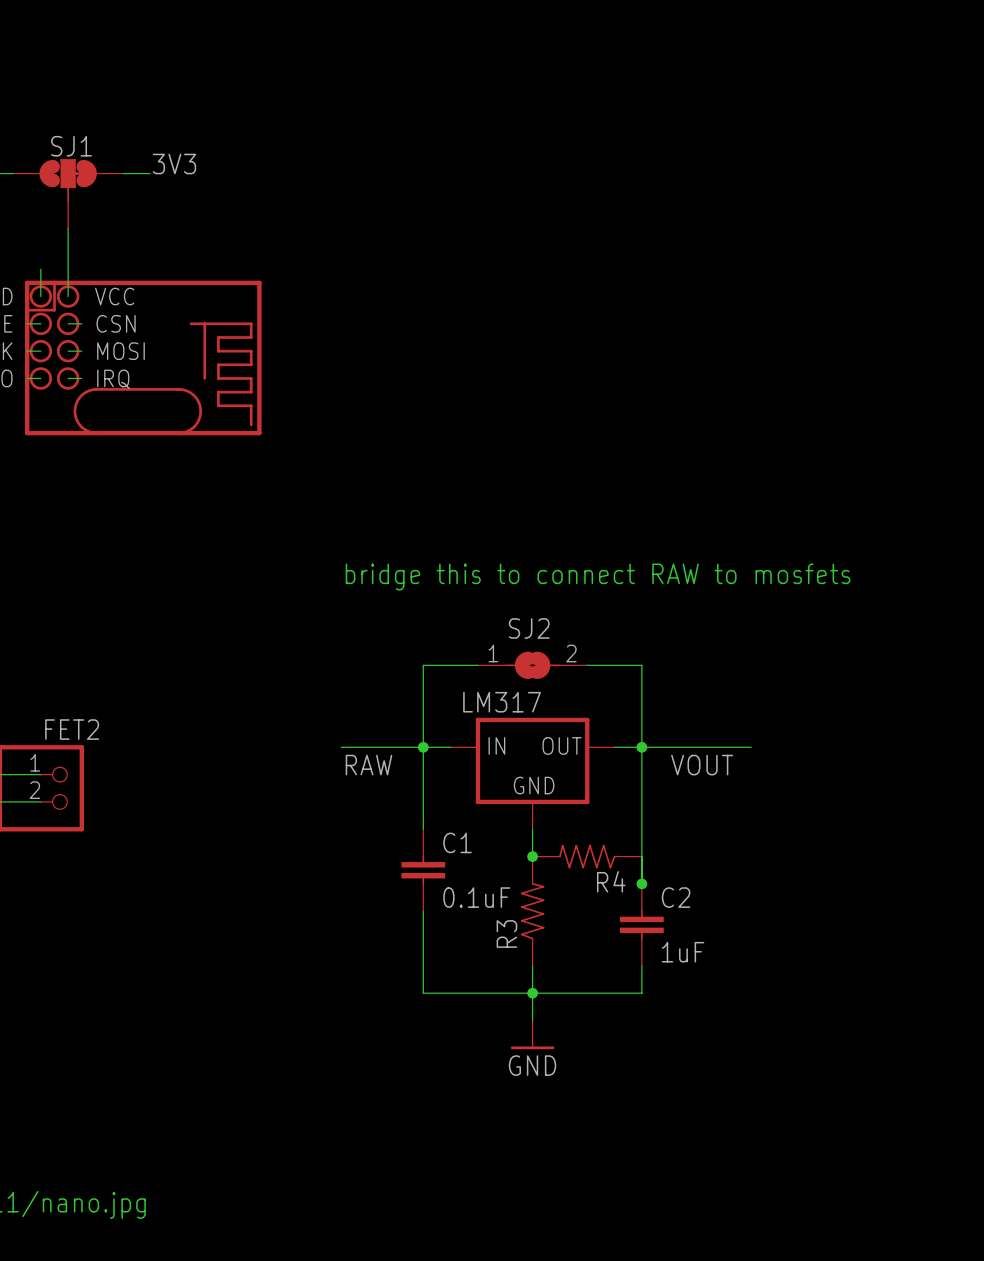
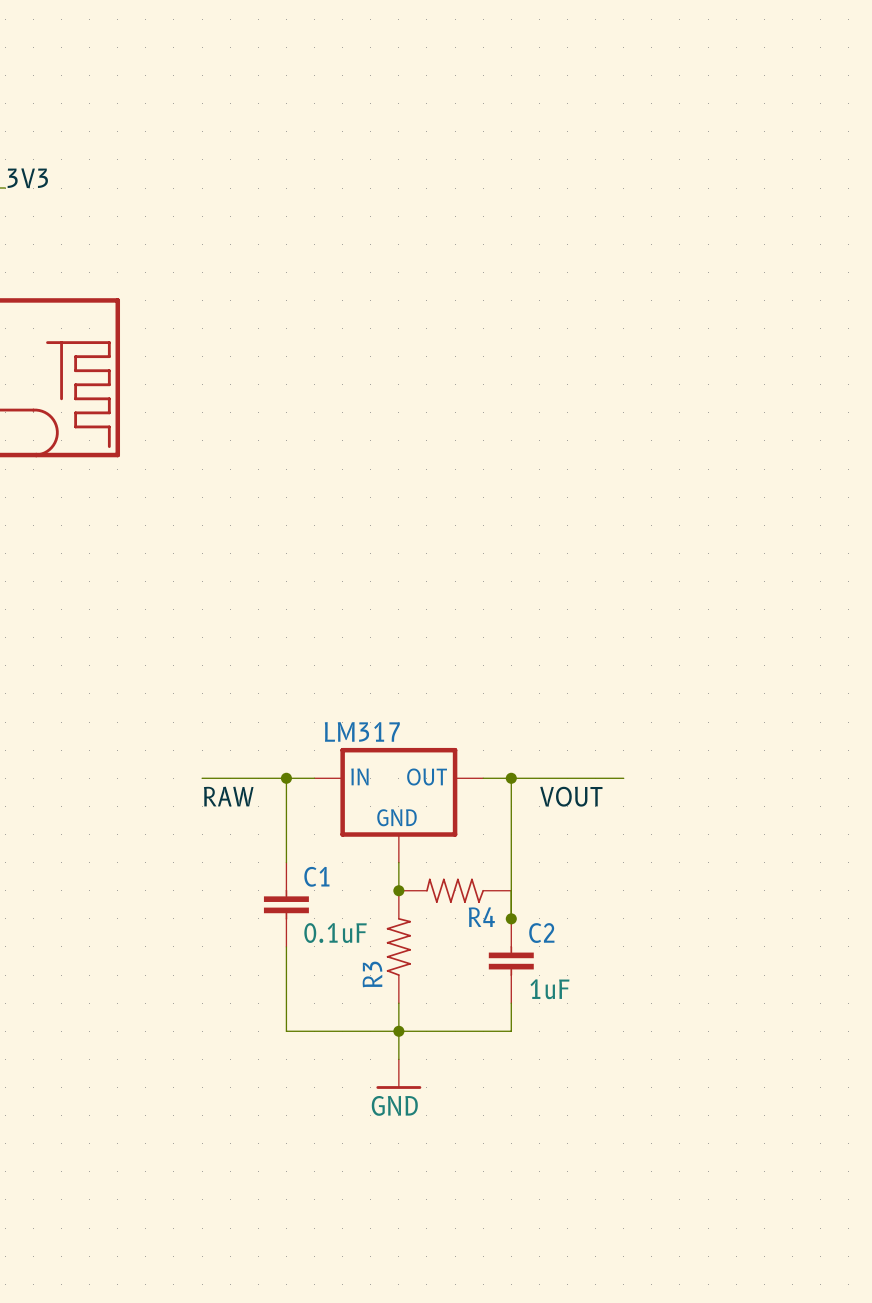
text: bridge this to connect RAW to mosfets (598, 577) -> none
wire: (477, 665) (423, 665) (423, 747) -> none
SJ2: (532, 665) -> none
wire: (587, 665) (641, 665) (641, 747) -> none

